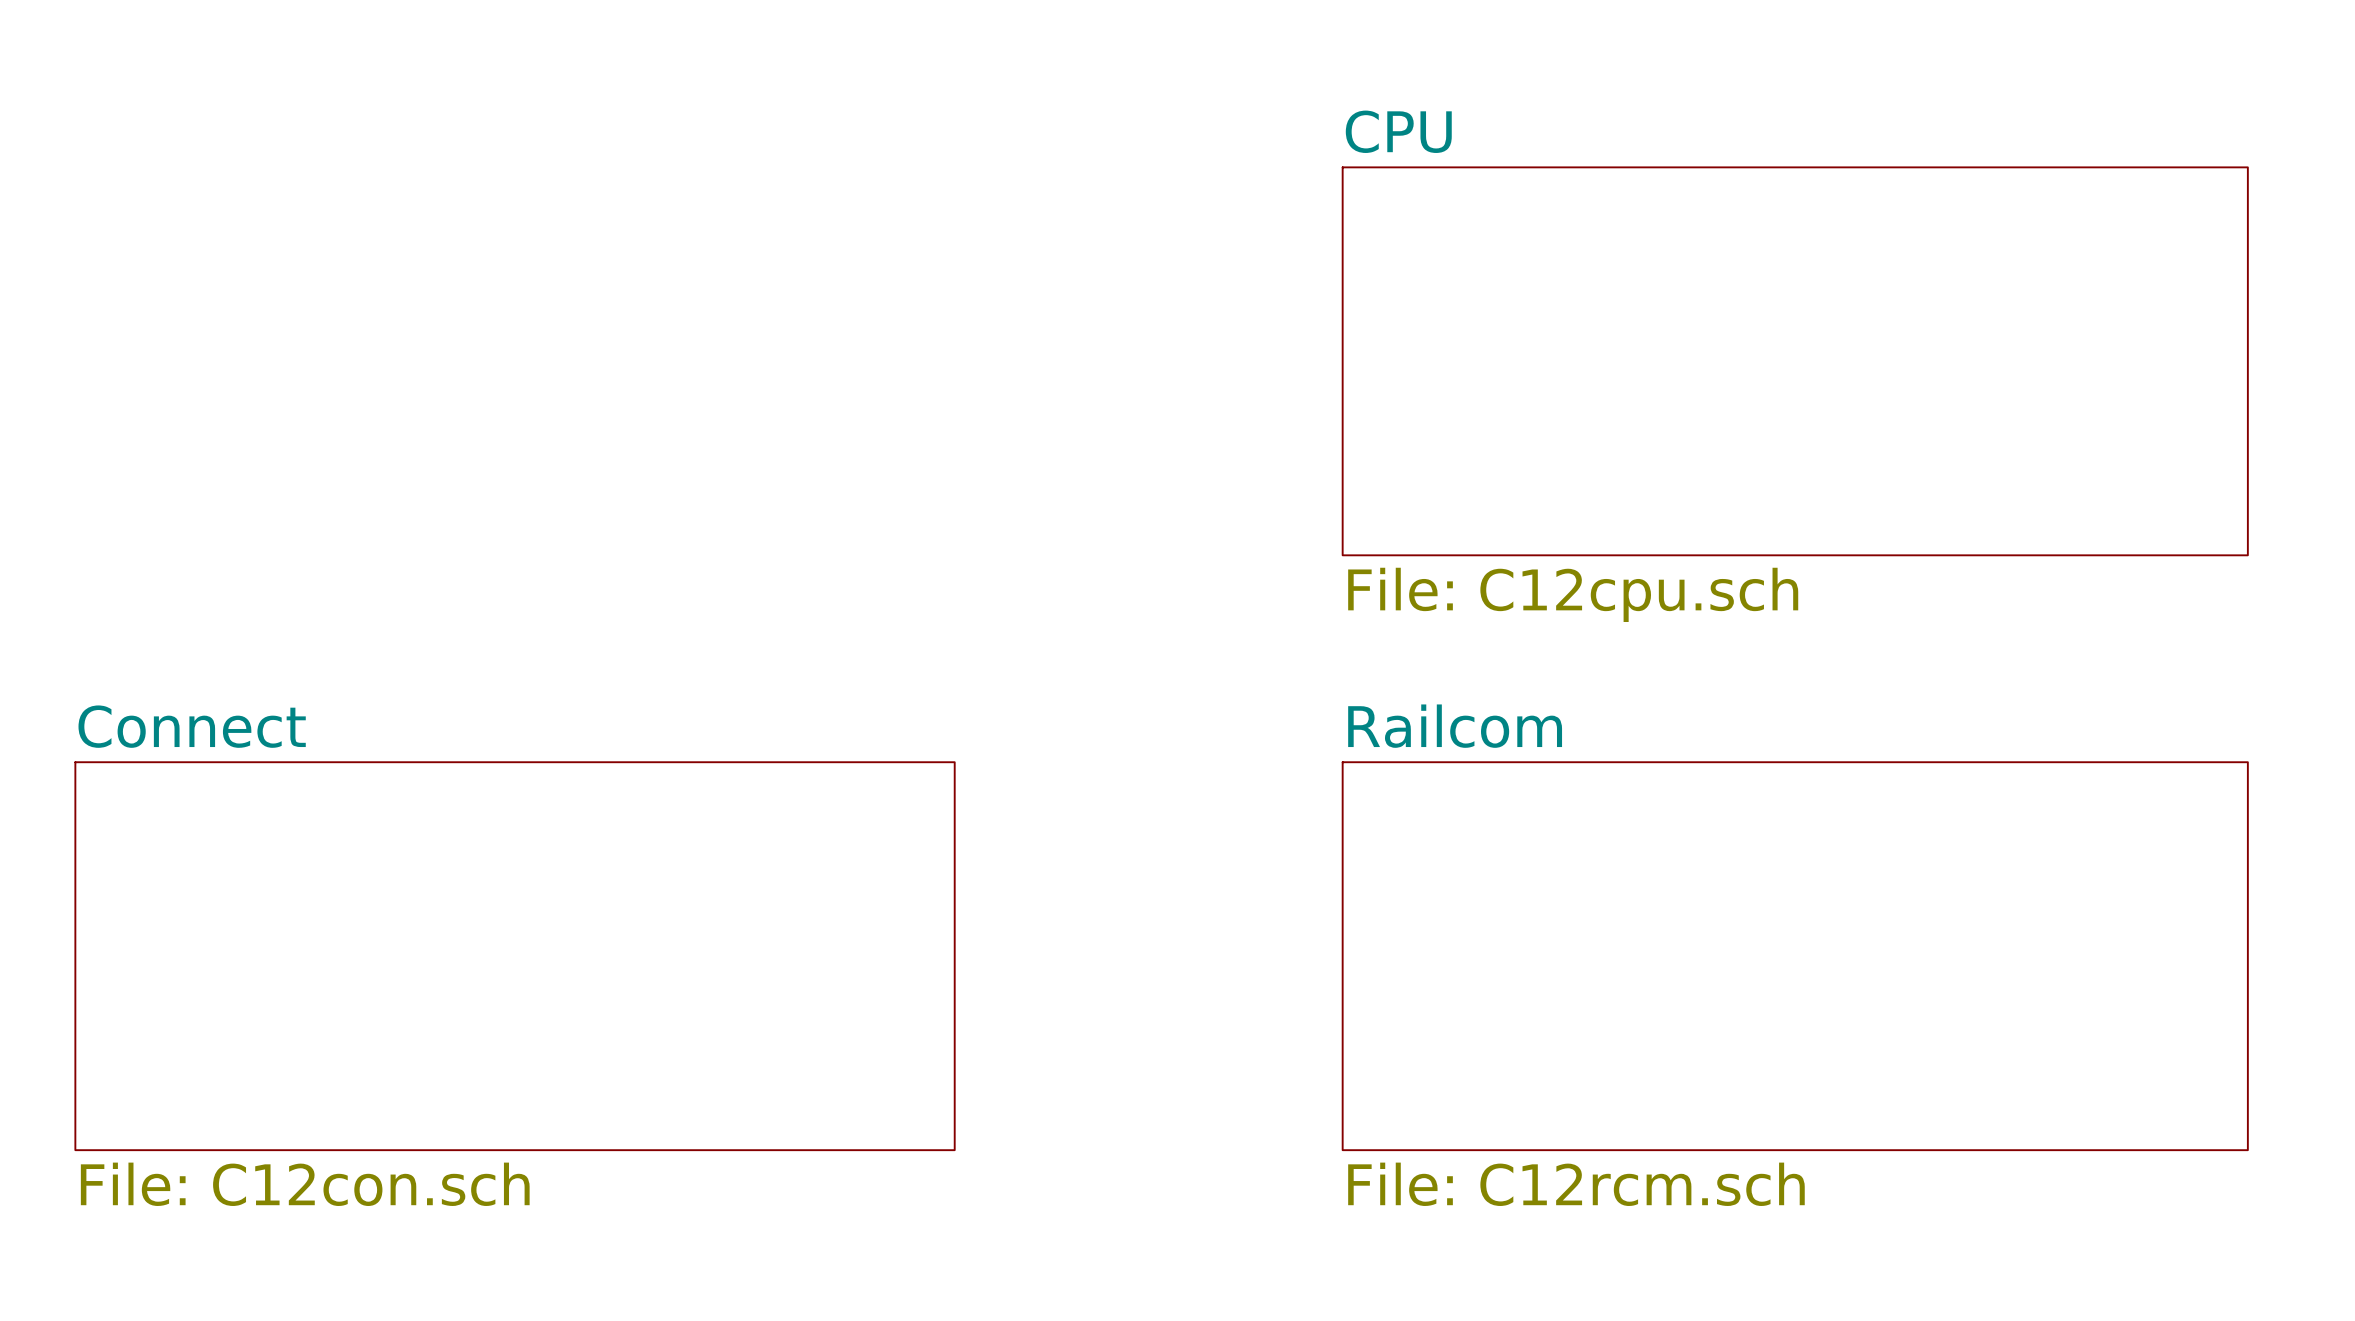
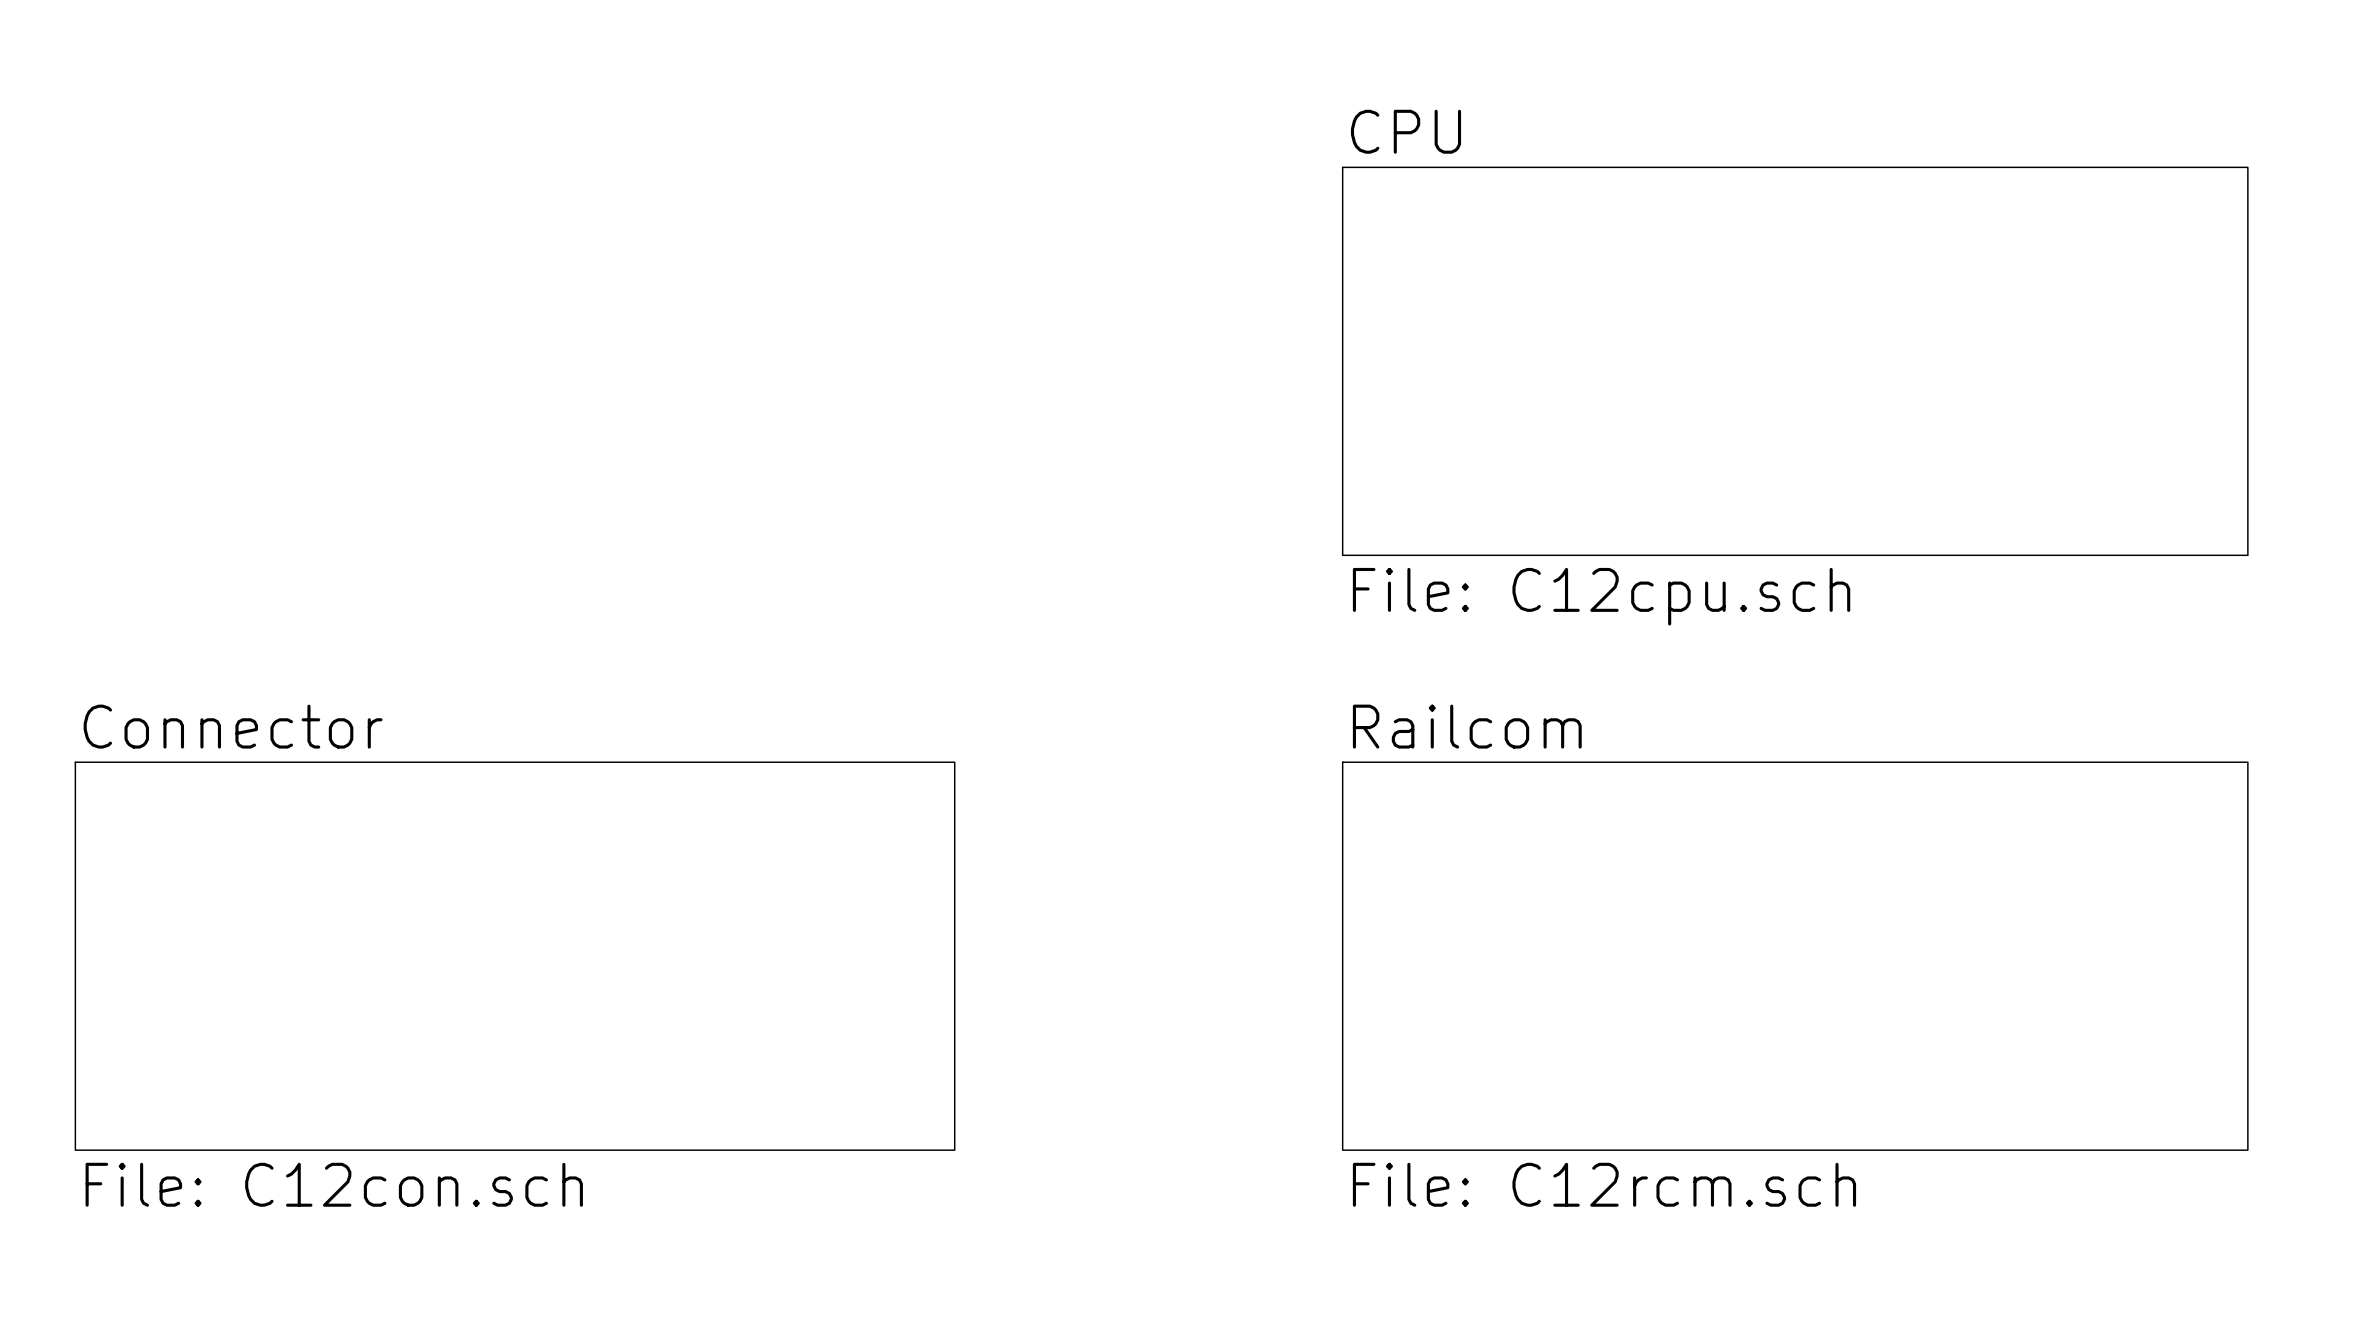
sheet Connect name: Connect (192, 726) -> Connector (233, 726)

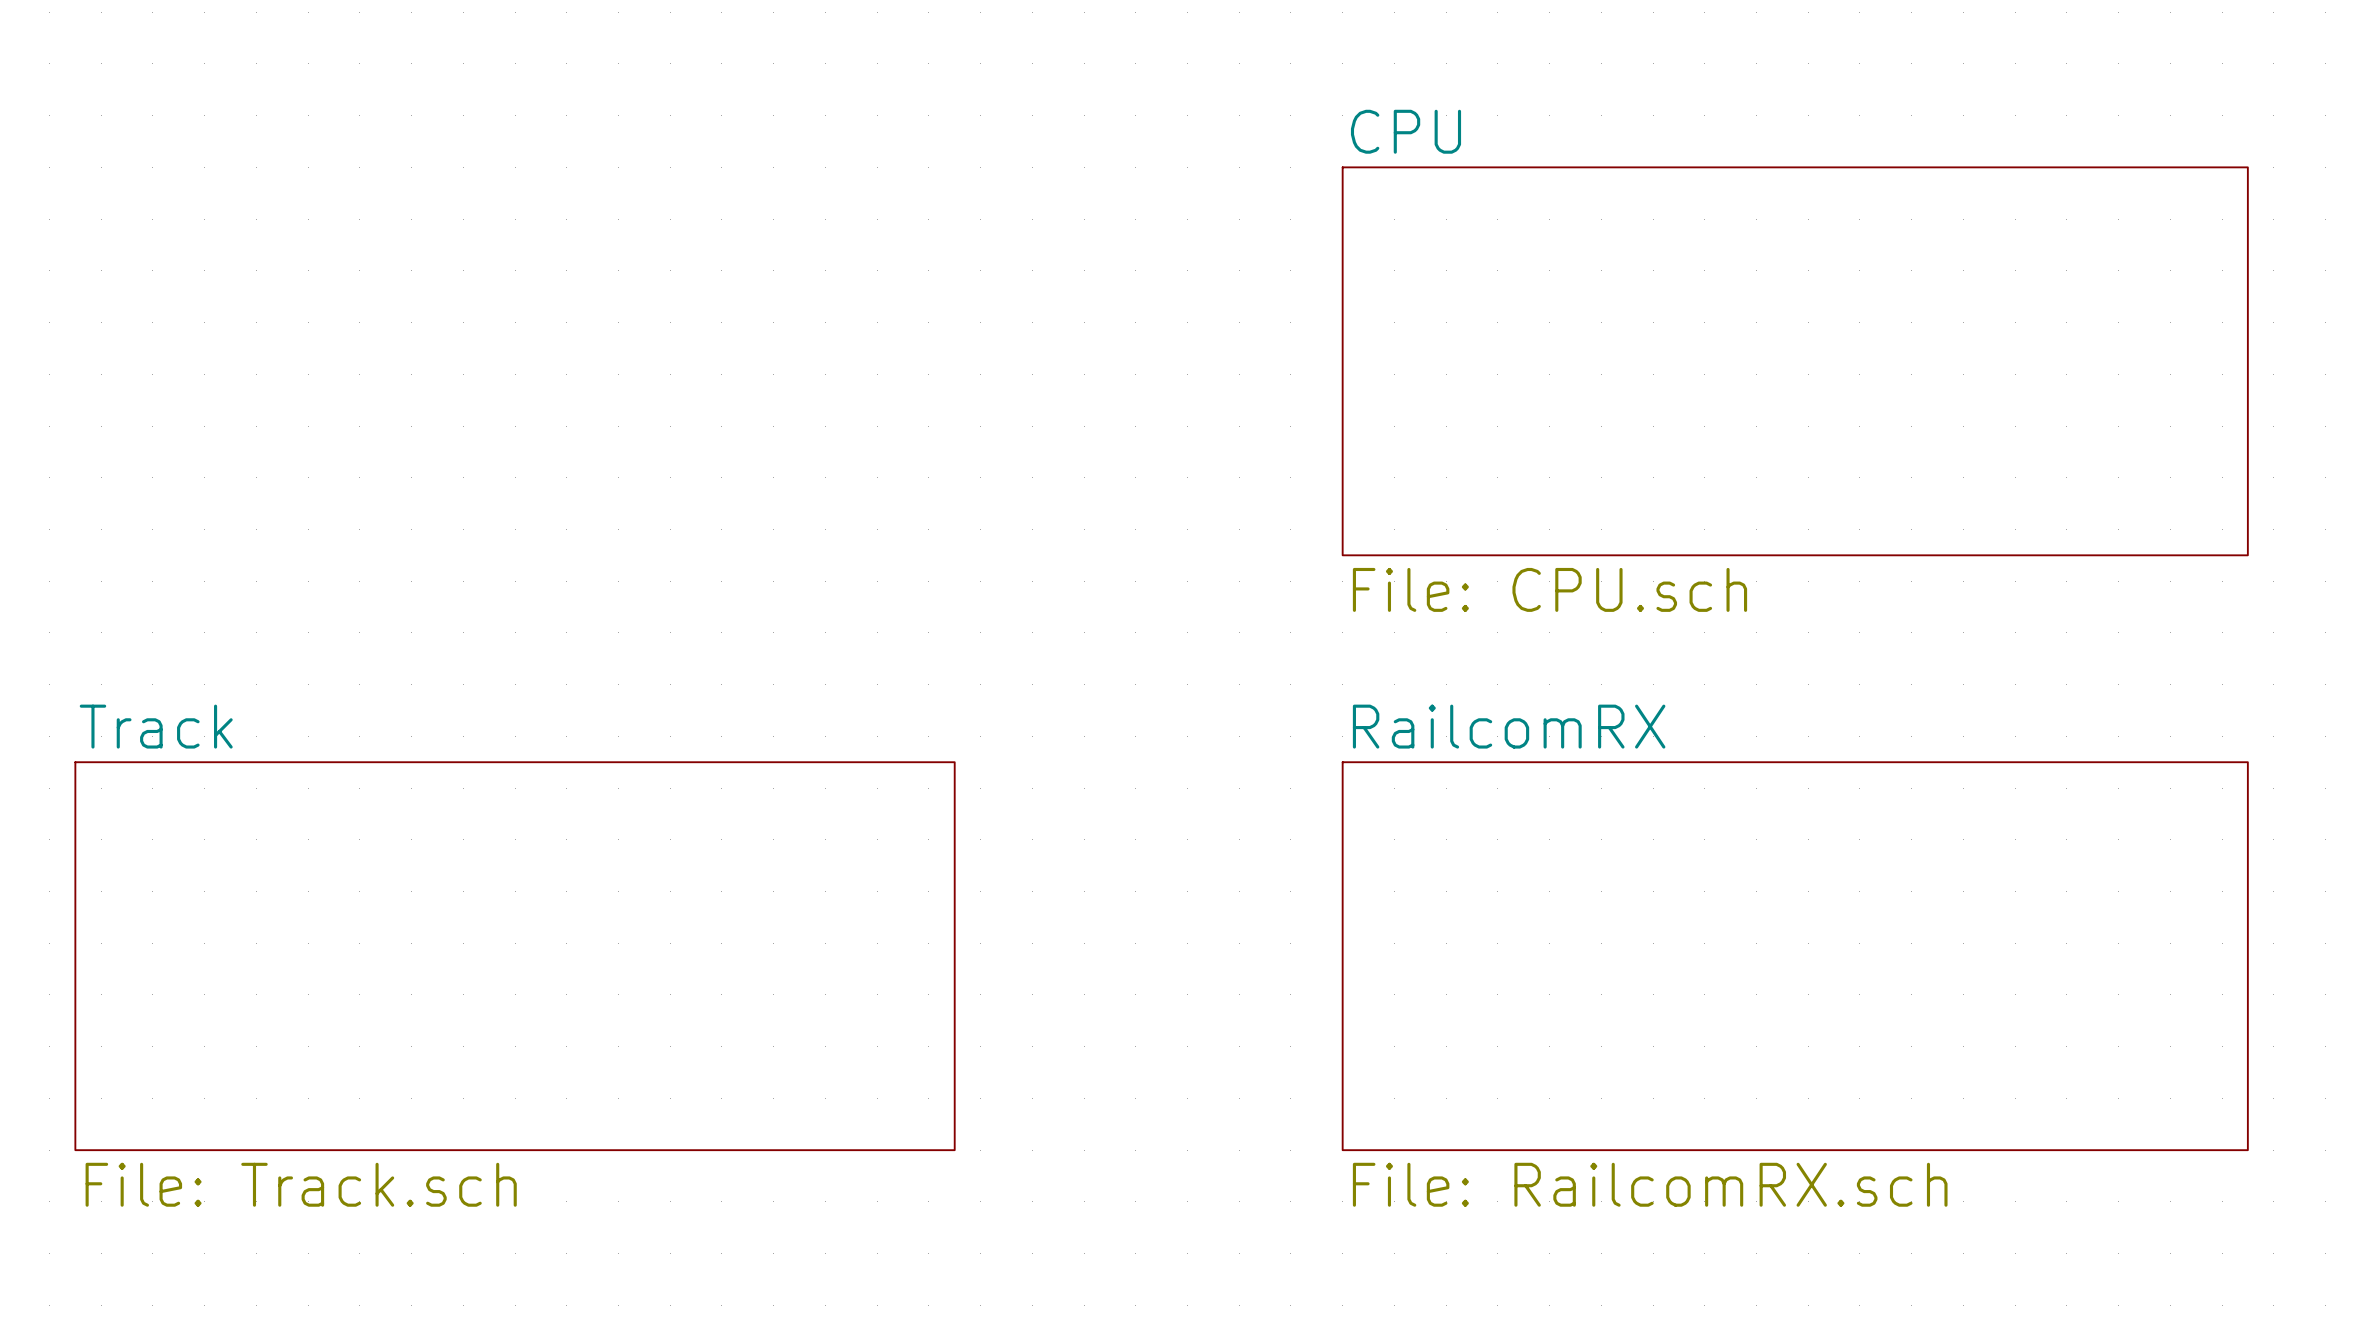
sheet CPU value: File: C12cpu.sch (1601, 596) -> File: CPU.sch (1549, 589)
sheet Connector name: Connector (233, 726) -> Track (156, 726)
sheet Railcom name: Railcom (1467, 726) -> RailcomRX (1509, 726)
sheet Connector value: File: C12con.sch (334, 1184) -> File: Track.sch (301, 1184)
sheet Railcom value: File: C12rcm.sch (1604, 1184) -> File: RailcomRX.sch (1650, 1184)

